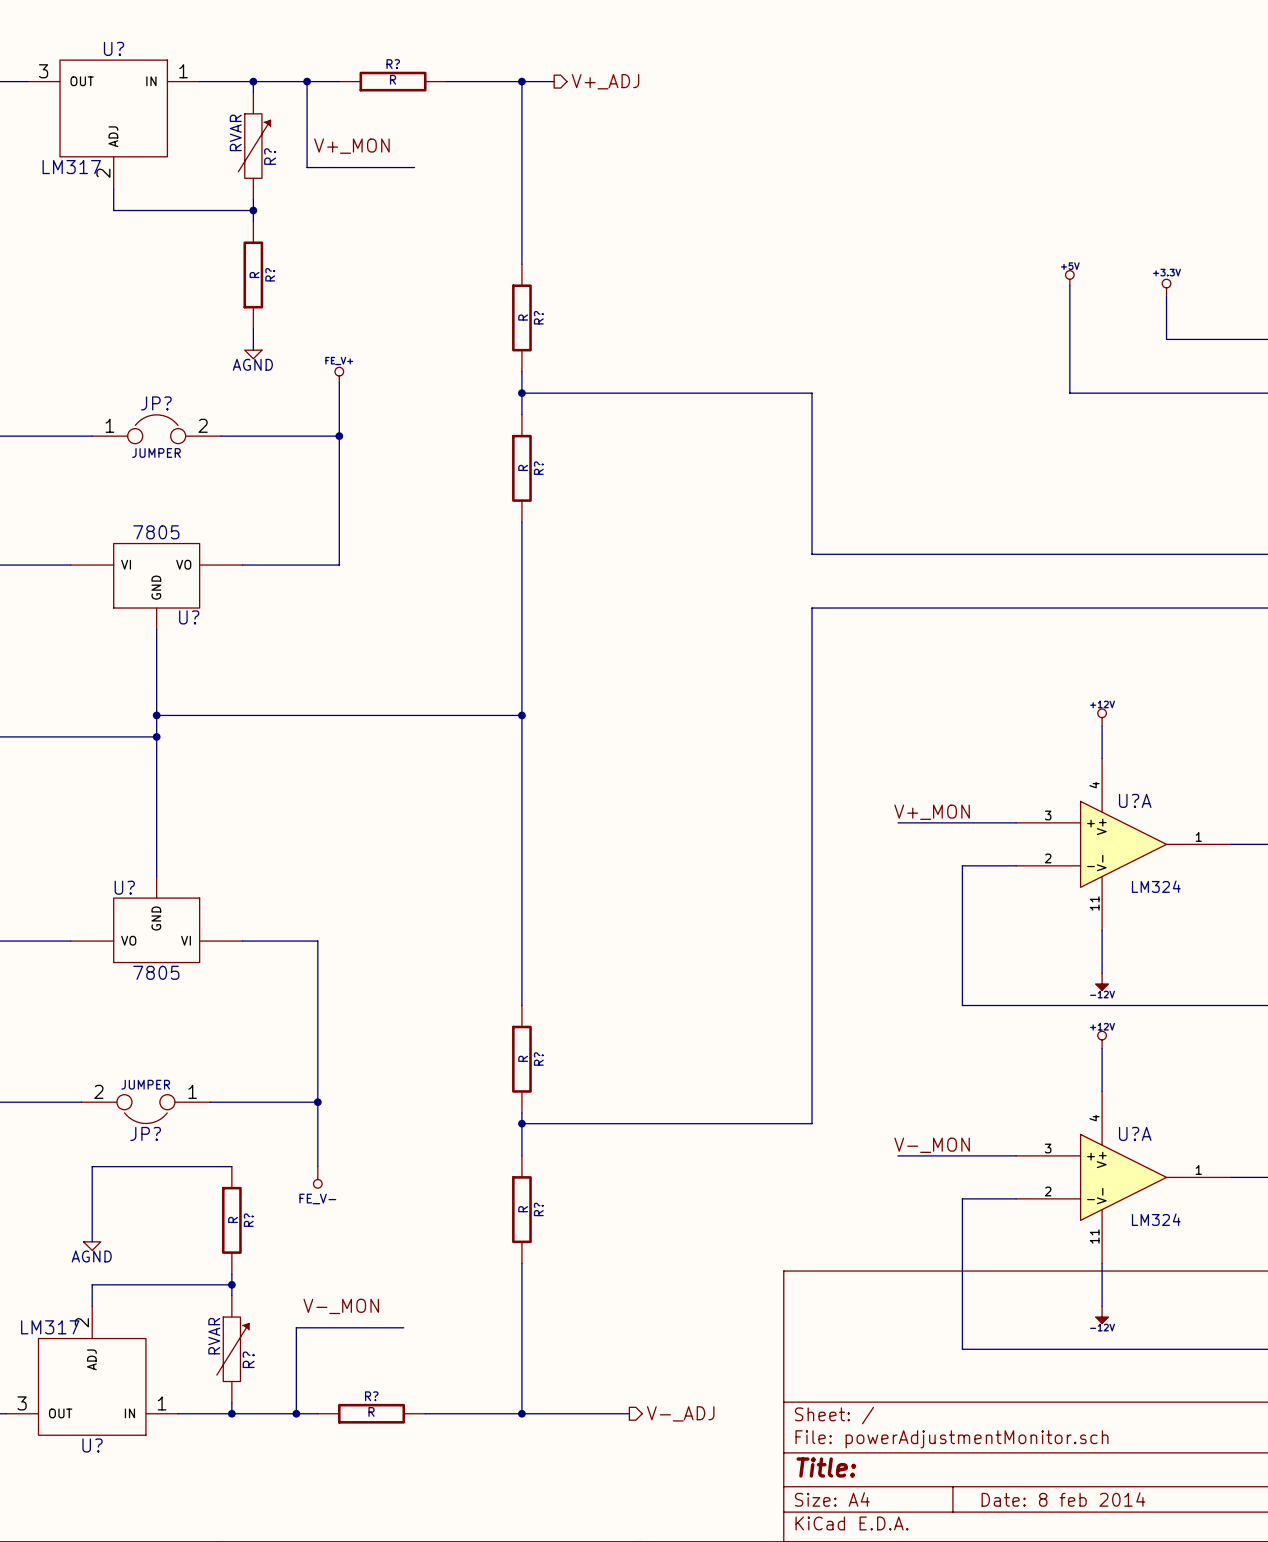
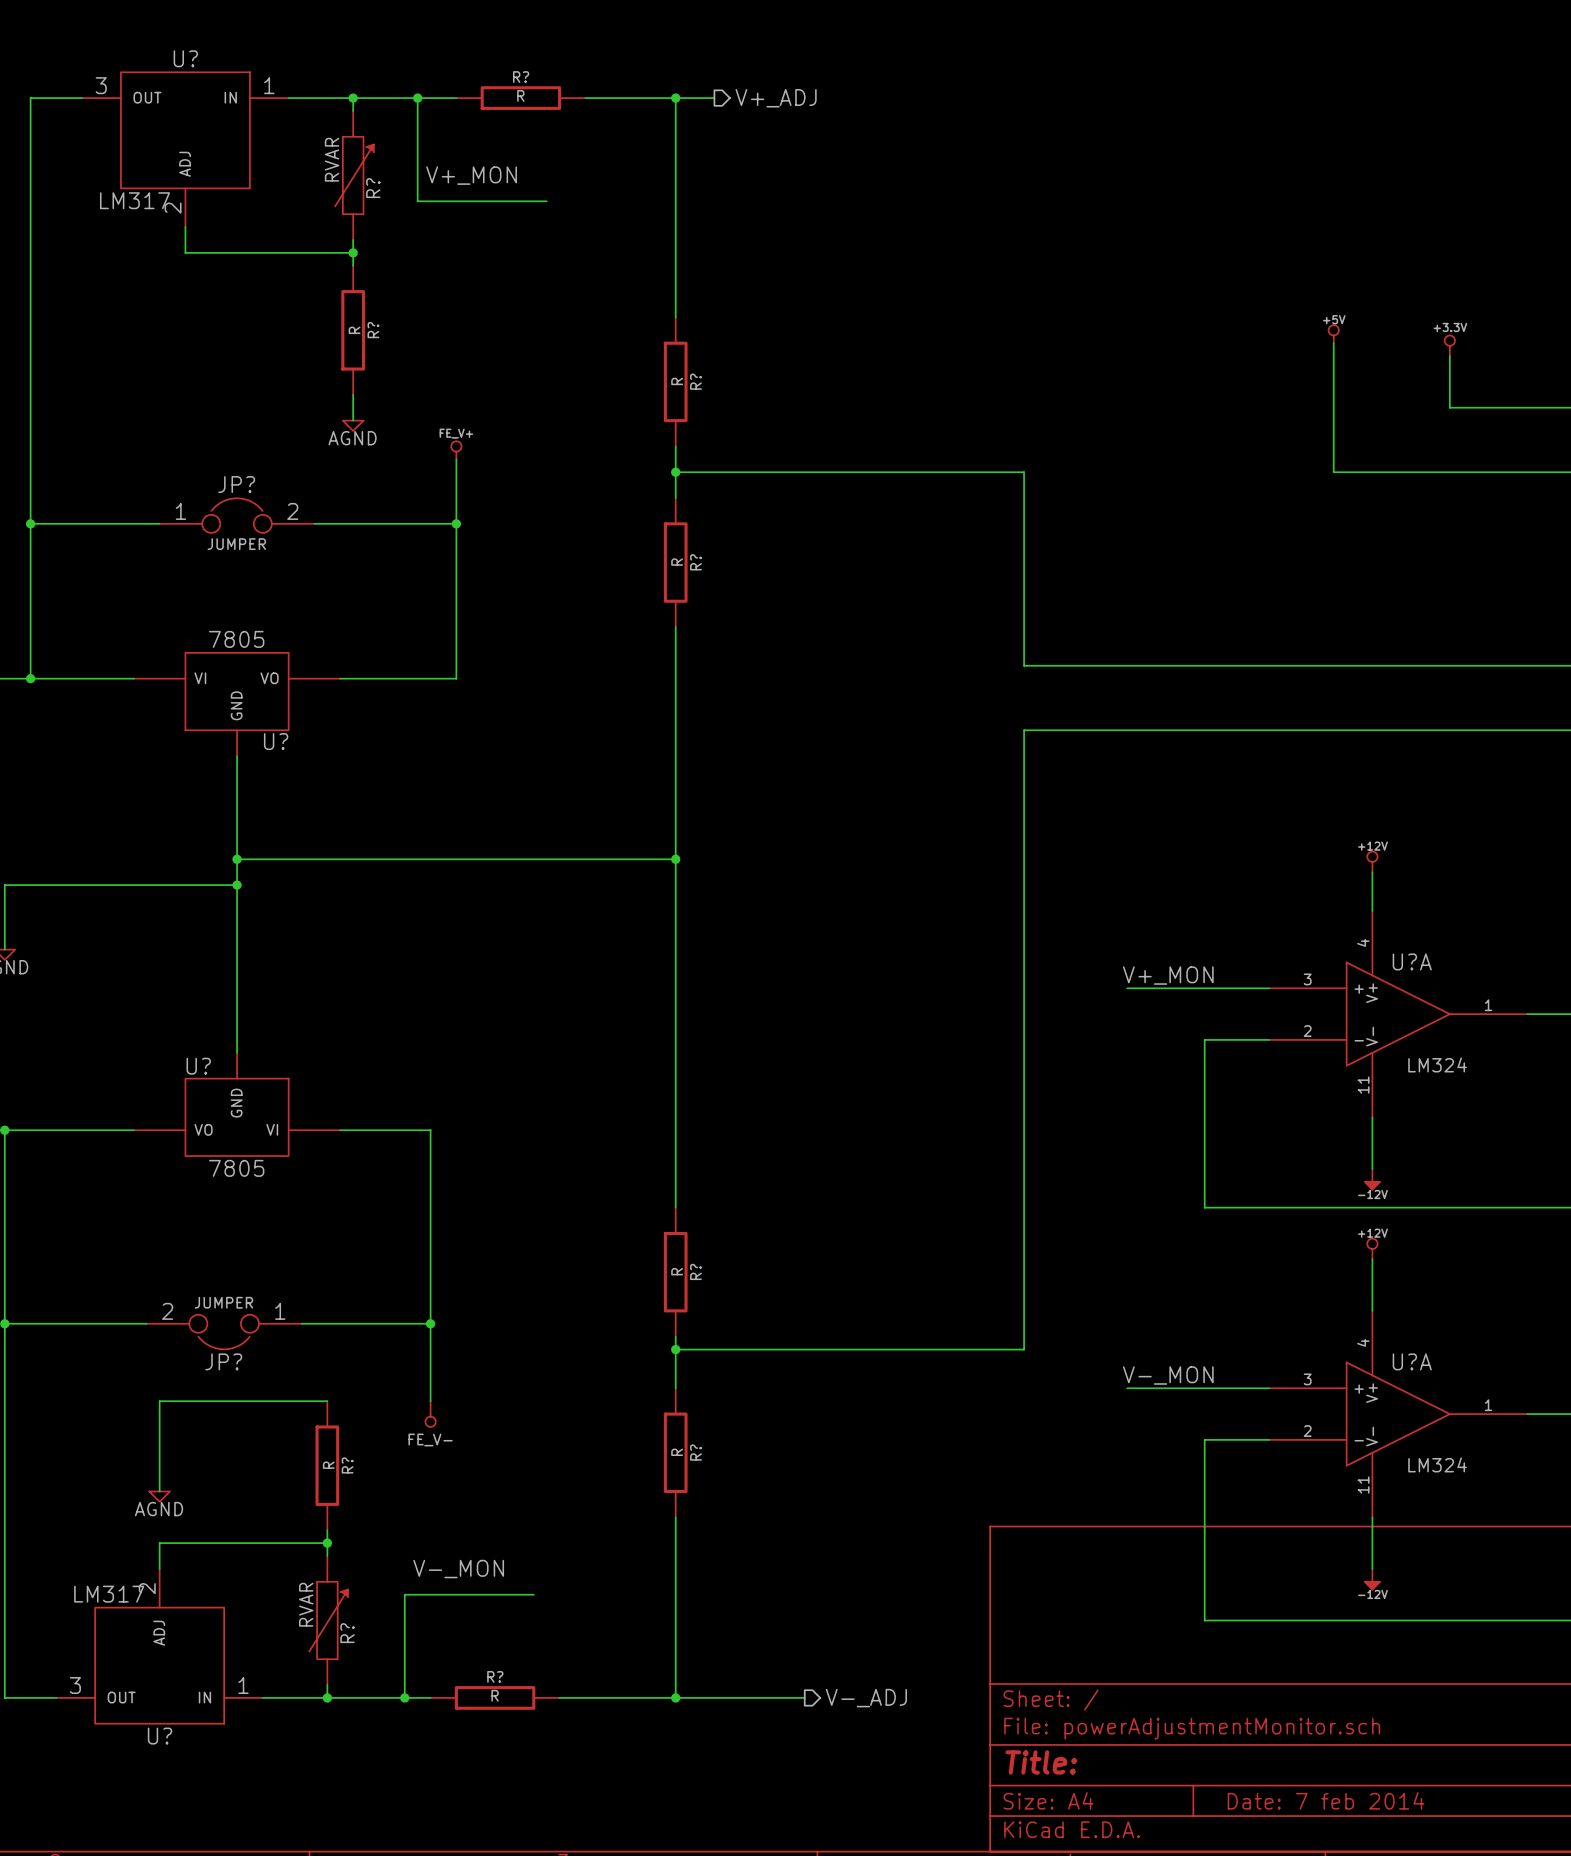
title block: Date: 8 feb 2014 (1063, 1499) -> Date: 7 feb 2014 (1326, 1800)

